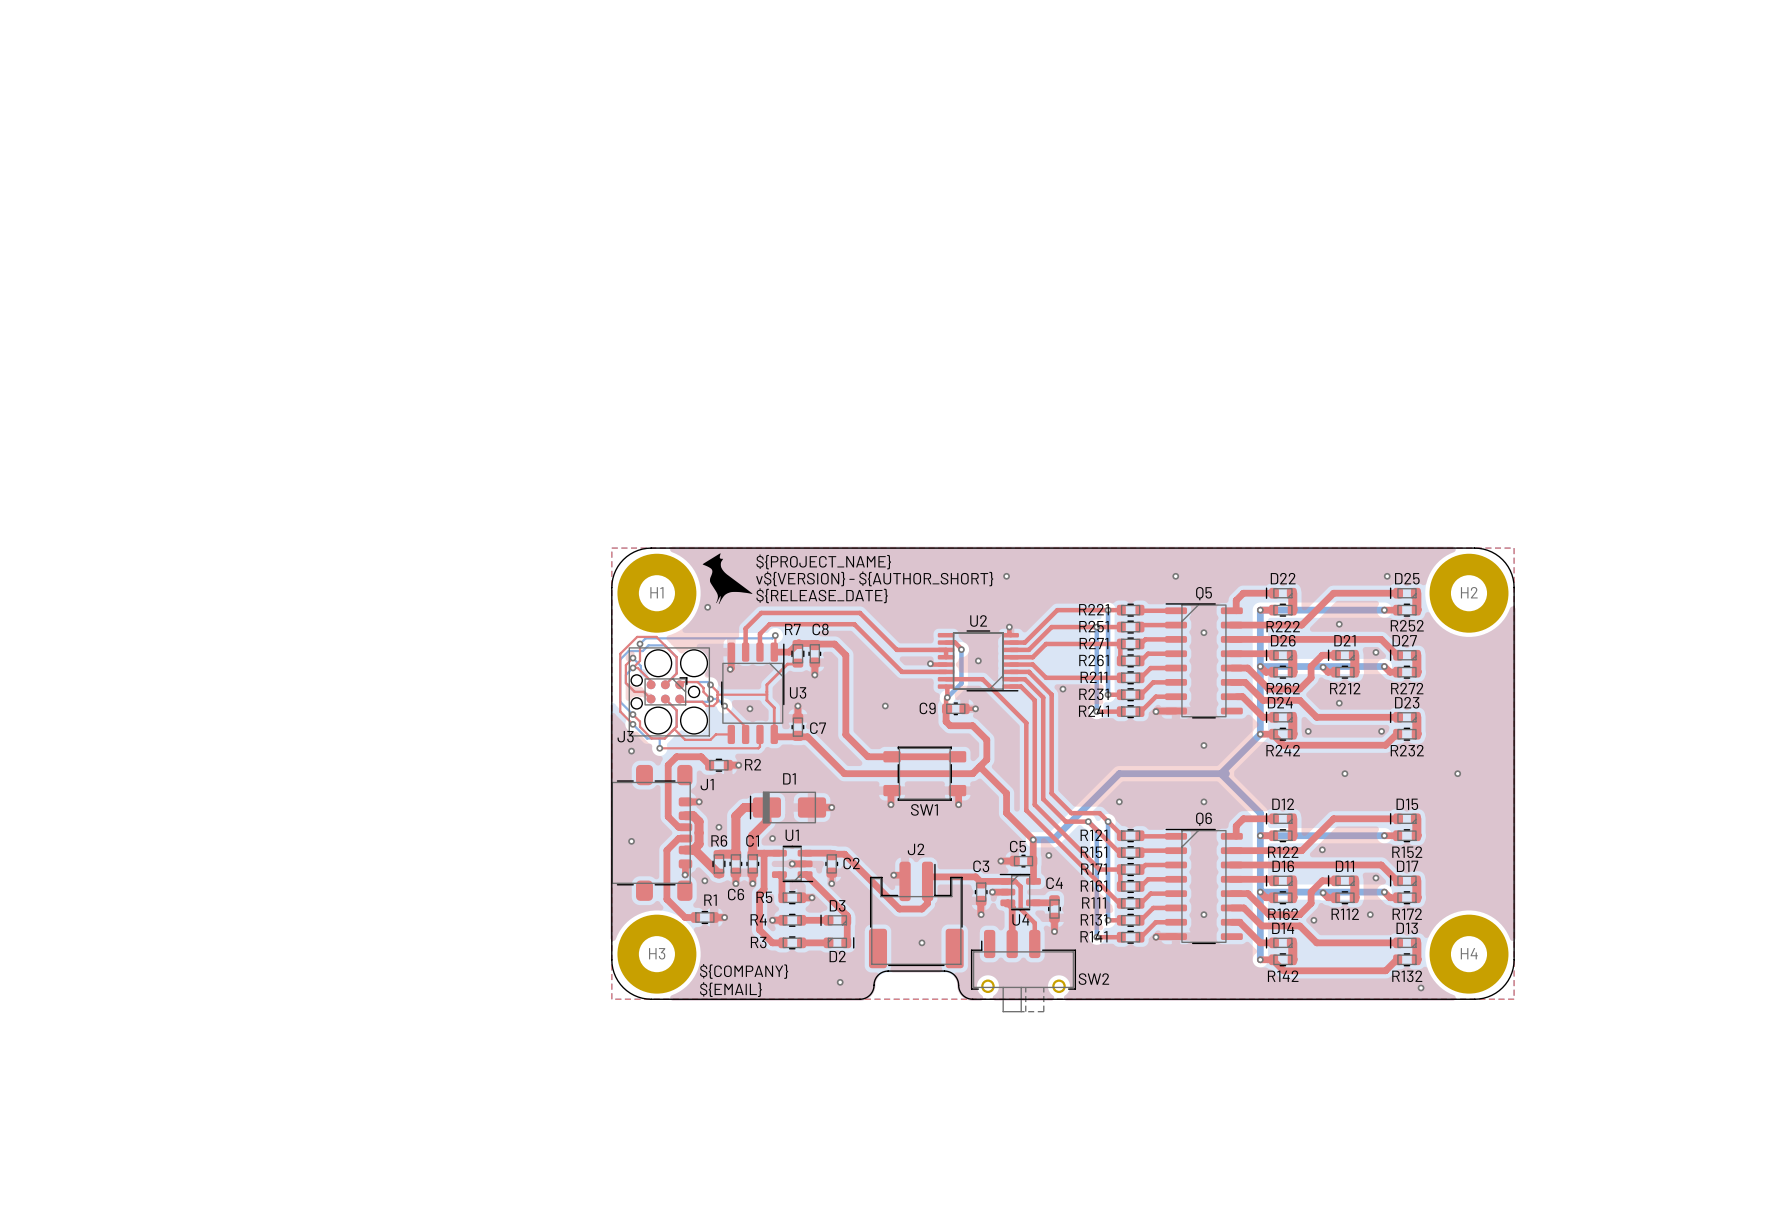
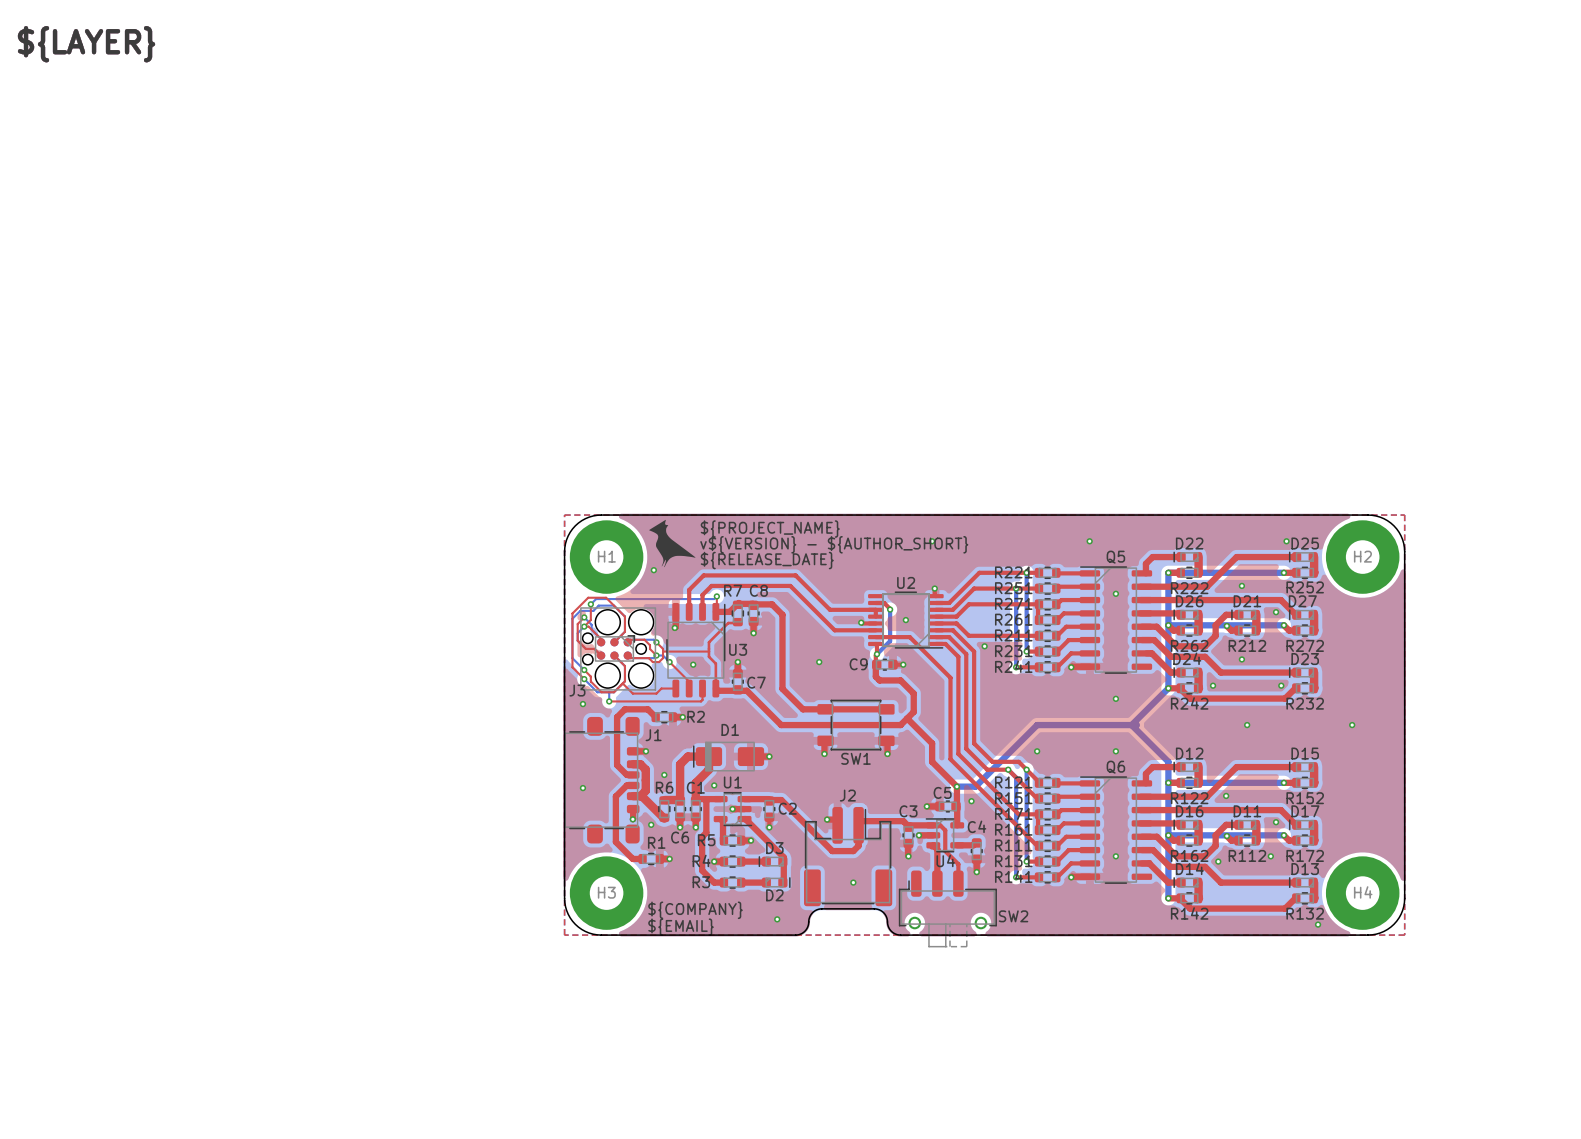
text: none -> ${LAYER} (86, 44)

